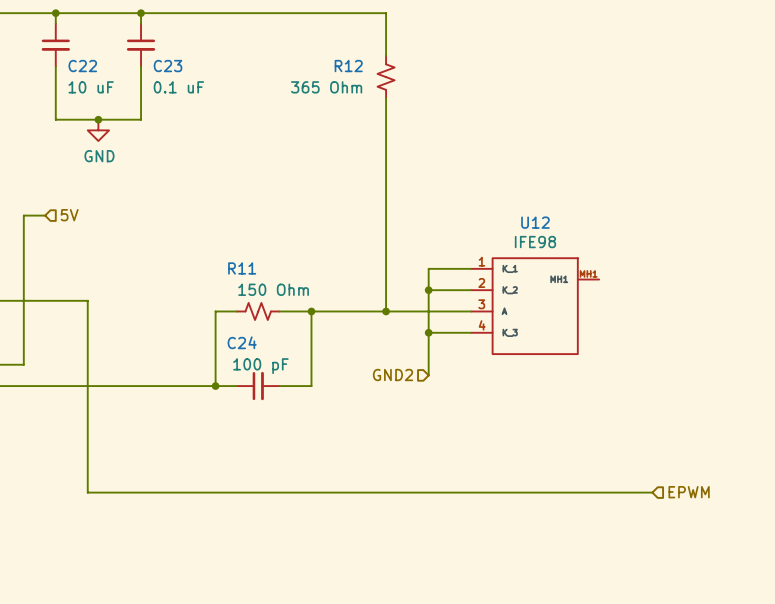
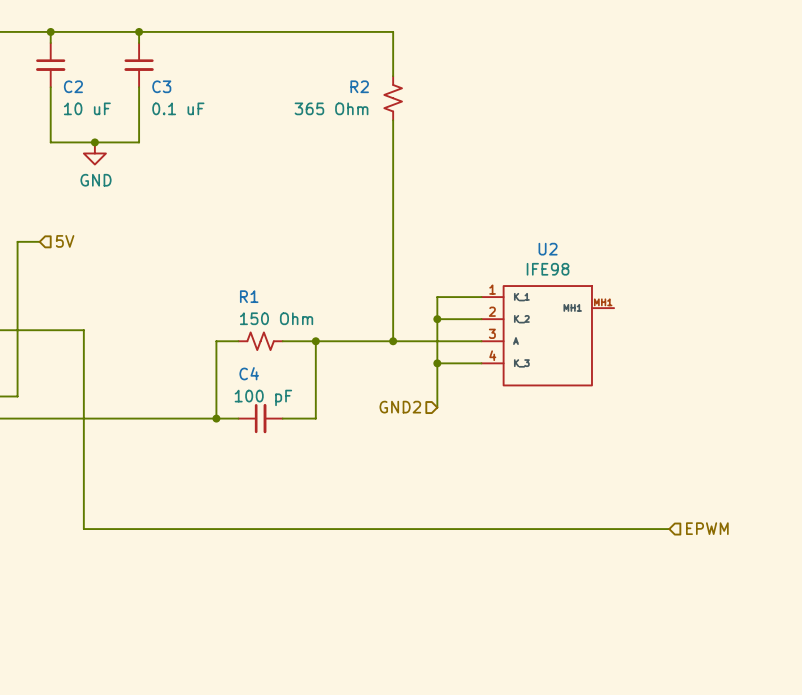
C22 name: C22 (82, 66) -> C2 (73, 86)
C23 name: C23 (167, 66) -> C3 (161, 86)
R12 name: R12 (348, 66) -> R2 (359, 86)
U12 name: U12 (535, 222) -> U2 (548, 249)
R11 name: R11 (242, 268) -> R1 (249, 296)
C24 name: C24 (242, 342) -> C4 (249, 373)

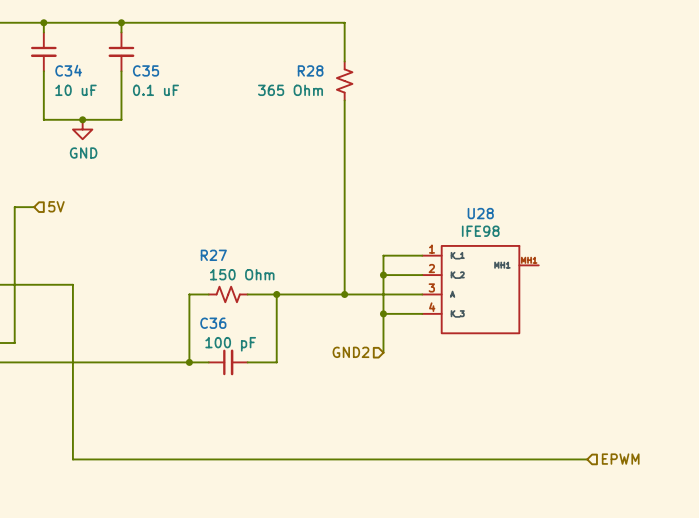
C2 name: C2 (73, 86) -> C34 (68, 70)
C3 name: C3 (161, 86) -> C35 (146, 70)
R2 name: R2 (359, 86) -> R28 (310, 70)
U2 name: U2 (548, 249) -> U28 (480, 213)
R1 name: R1 (249, 296) -> R27 (213, 255)
C4 name: C4 (249, 373) -> C36 (213, 323)

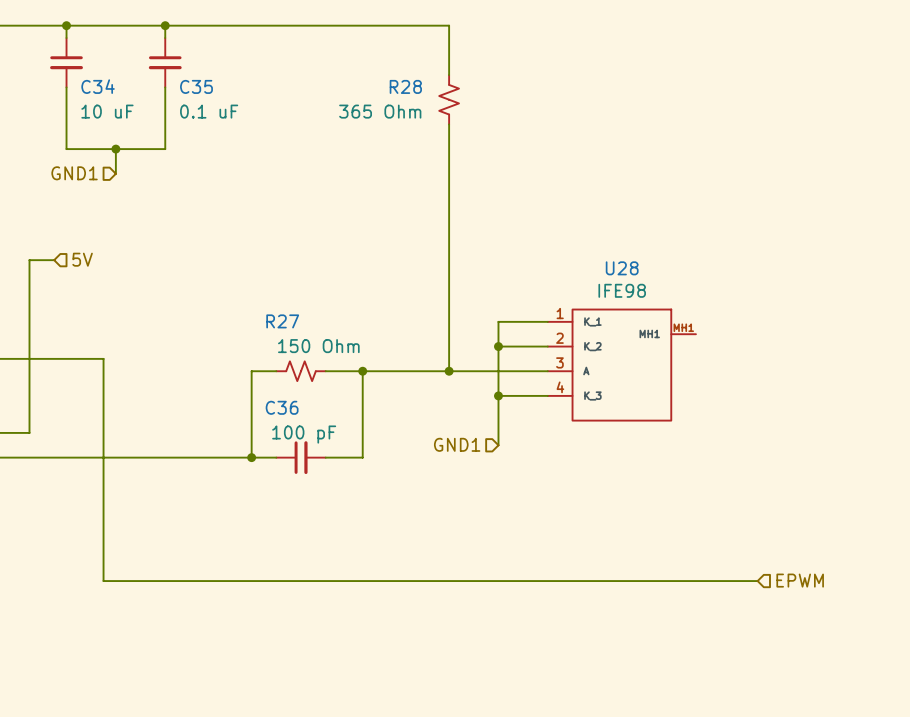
power symbol: GND (82, 129) -> none
hierarchical label: none -> GND1 (74, 173)
hierarchical label: GND2 (350, 352) -> GND1 (457, 444)

